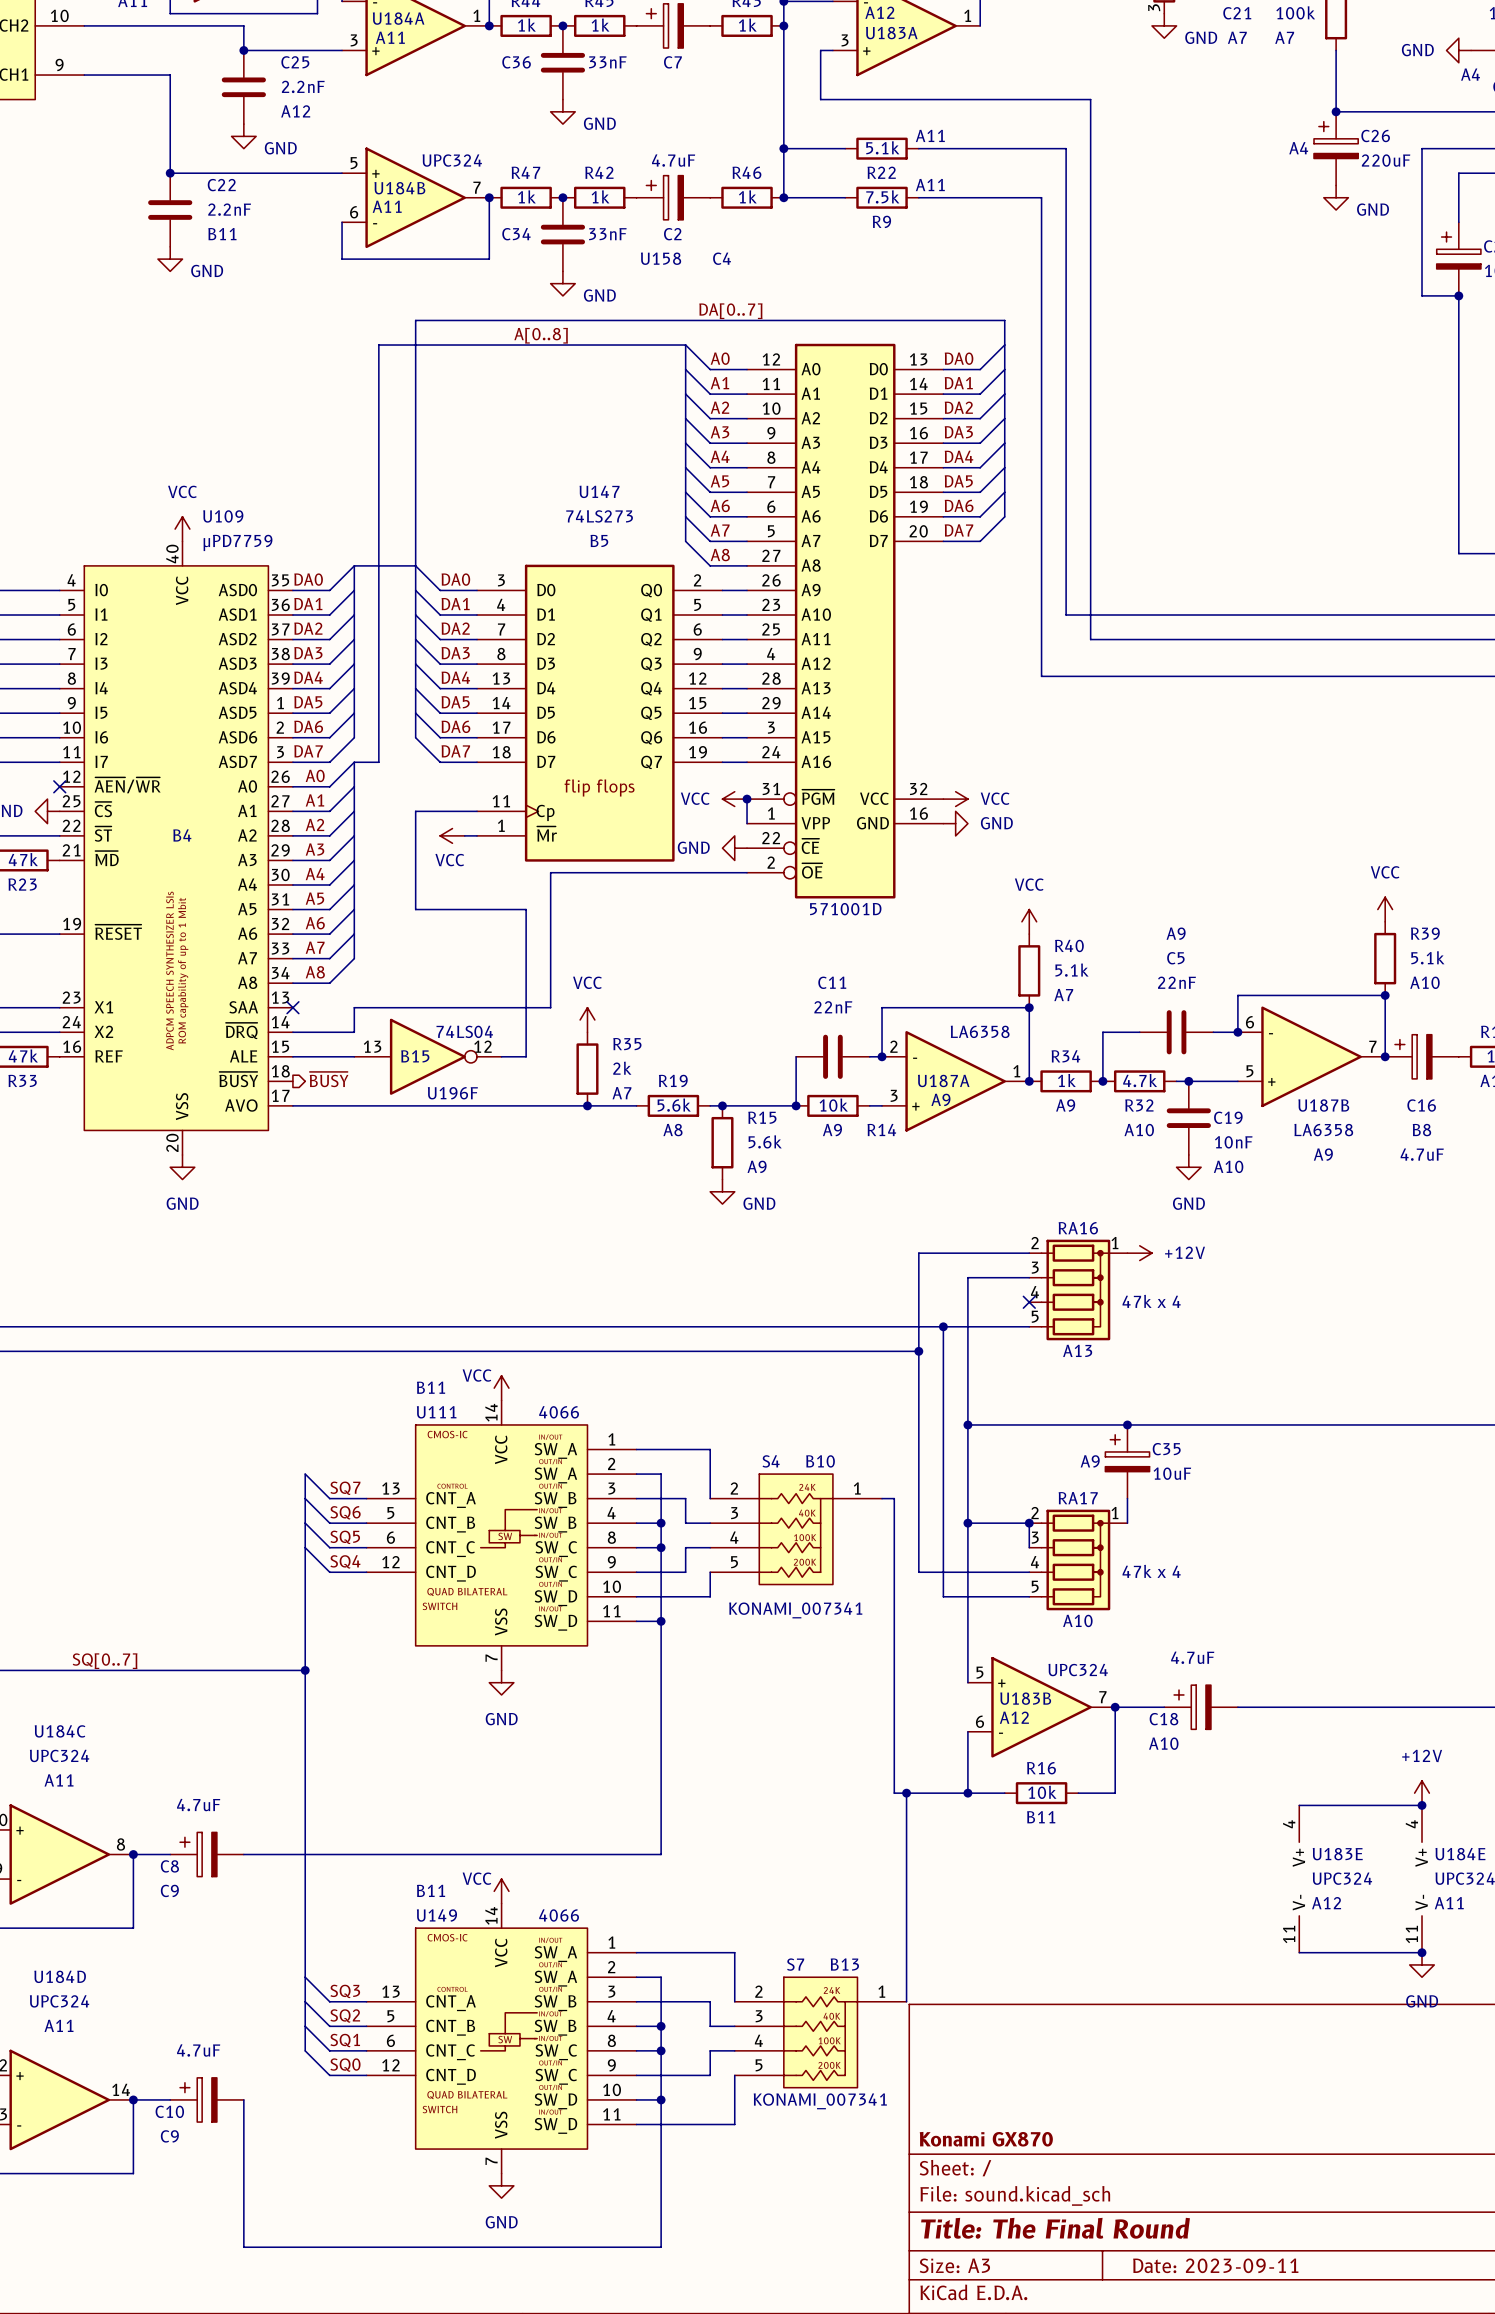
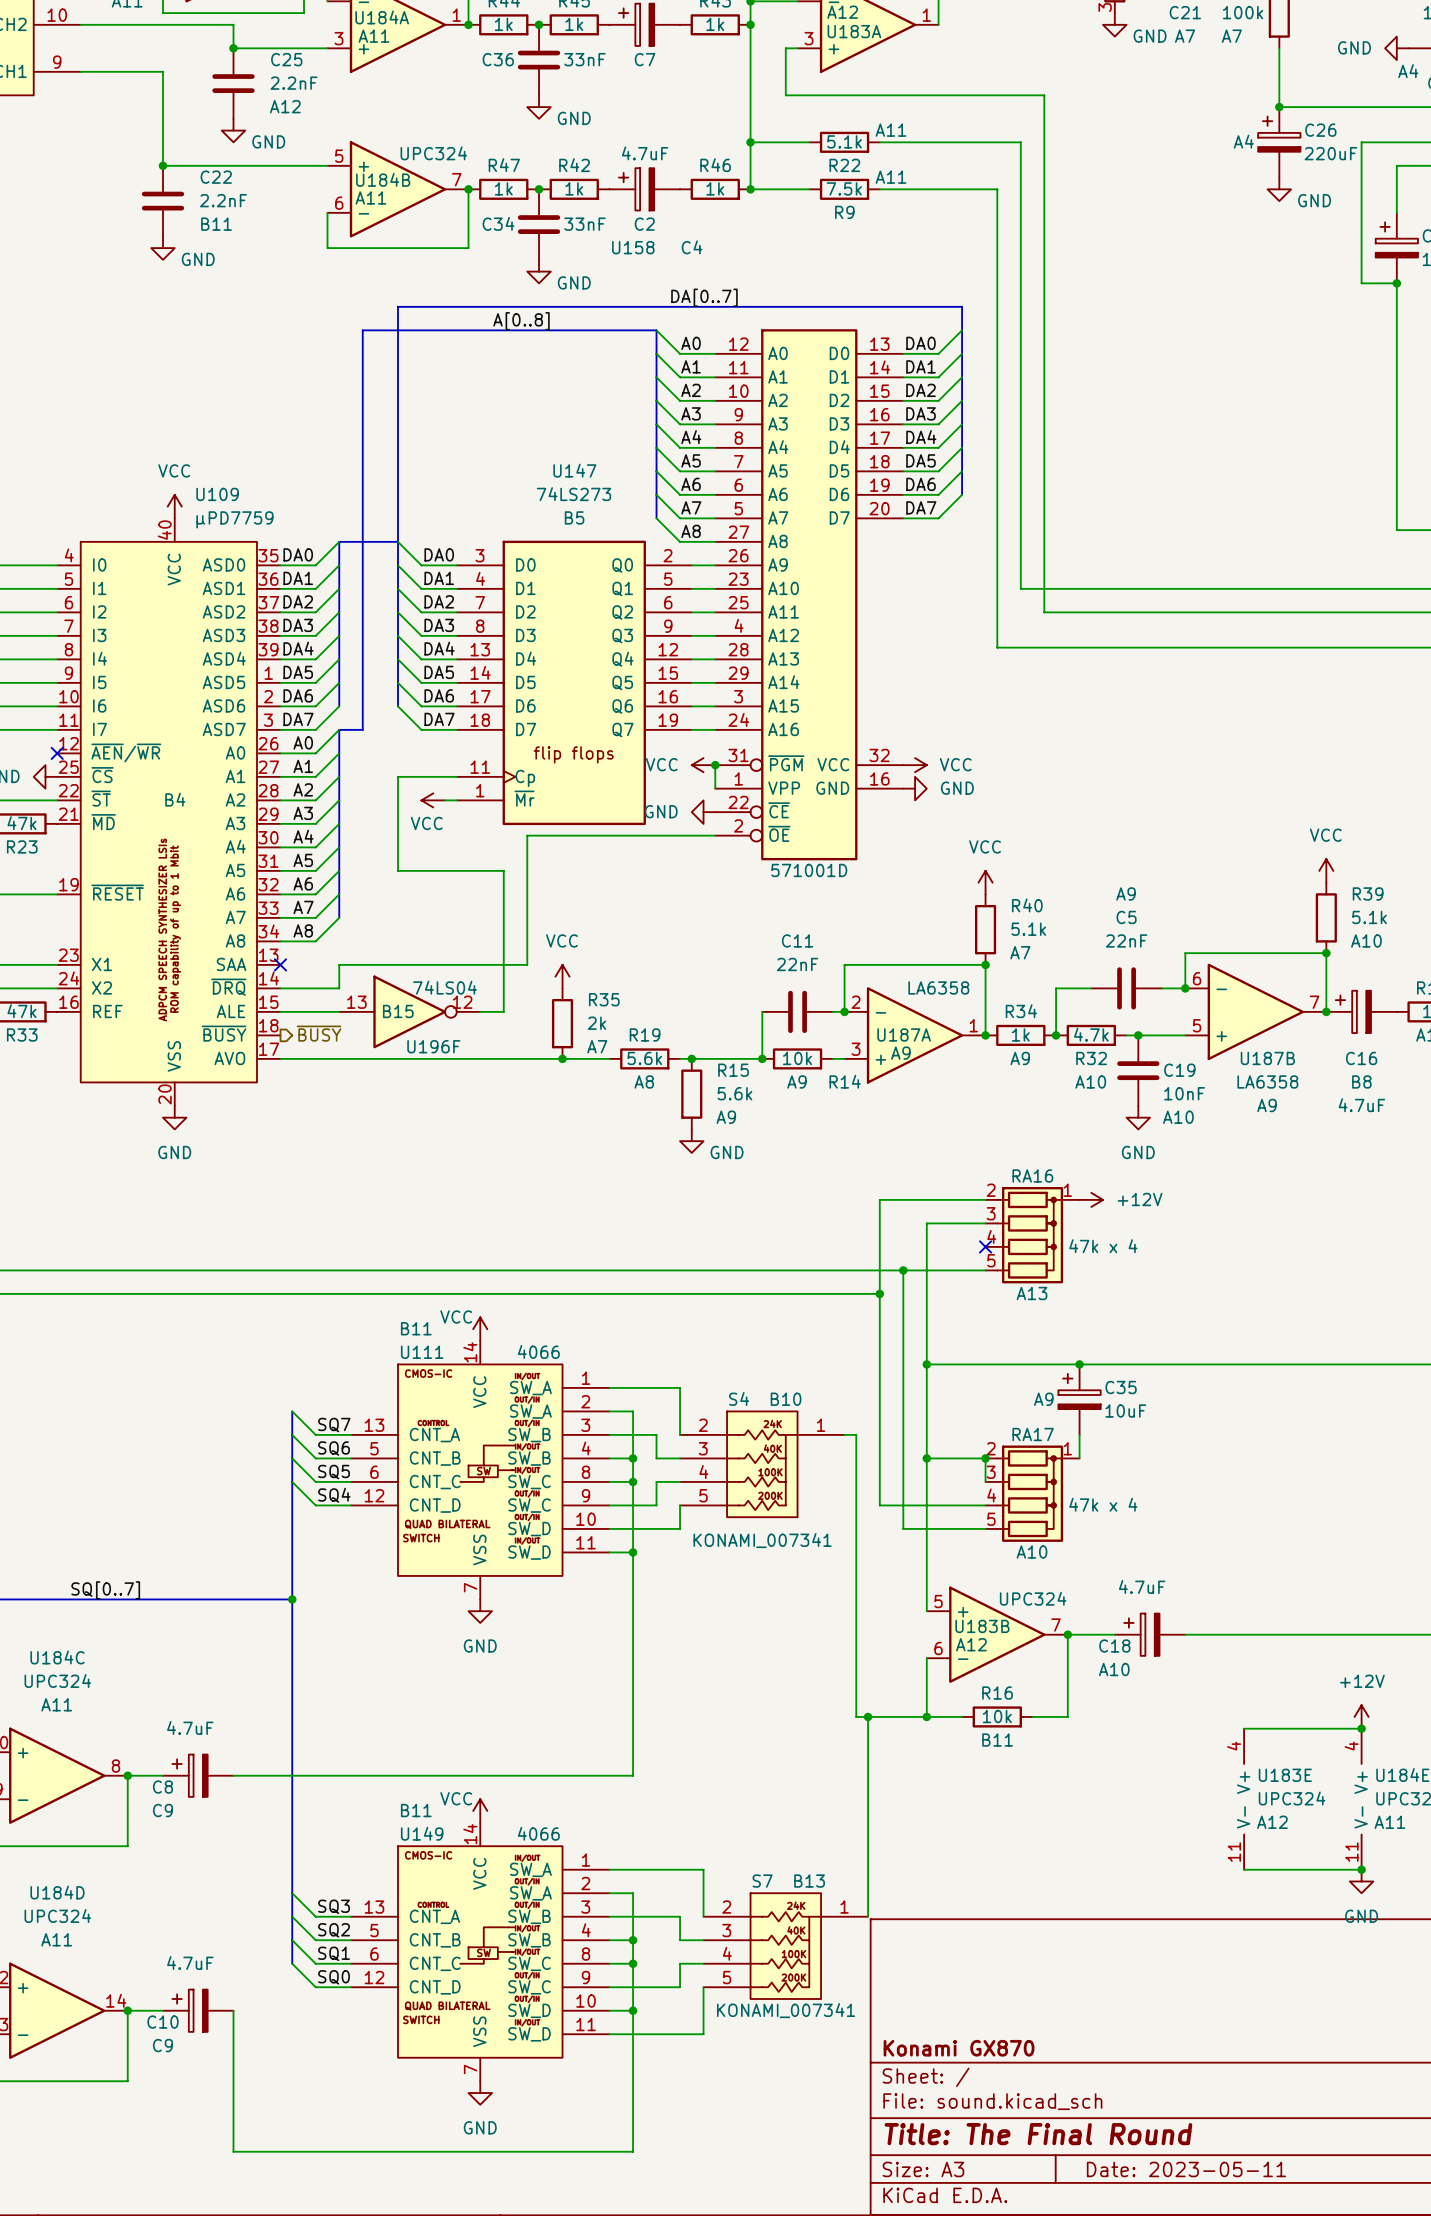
title block: Date: 2023-09-11 (1215, 2265) -> Date: 2023-05-11 (1186, 2169)

